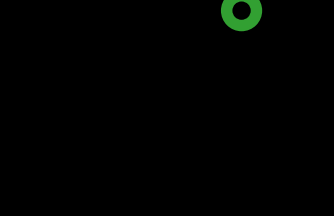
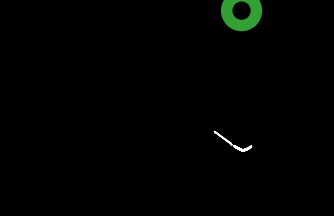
board edge: none -> (214, 131) (215, 132)
board edge: none -> (215, 132) (231, 144)

